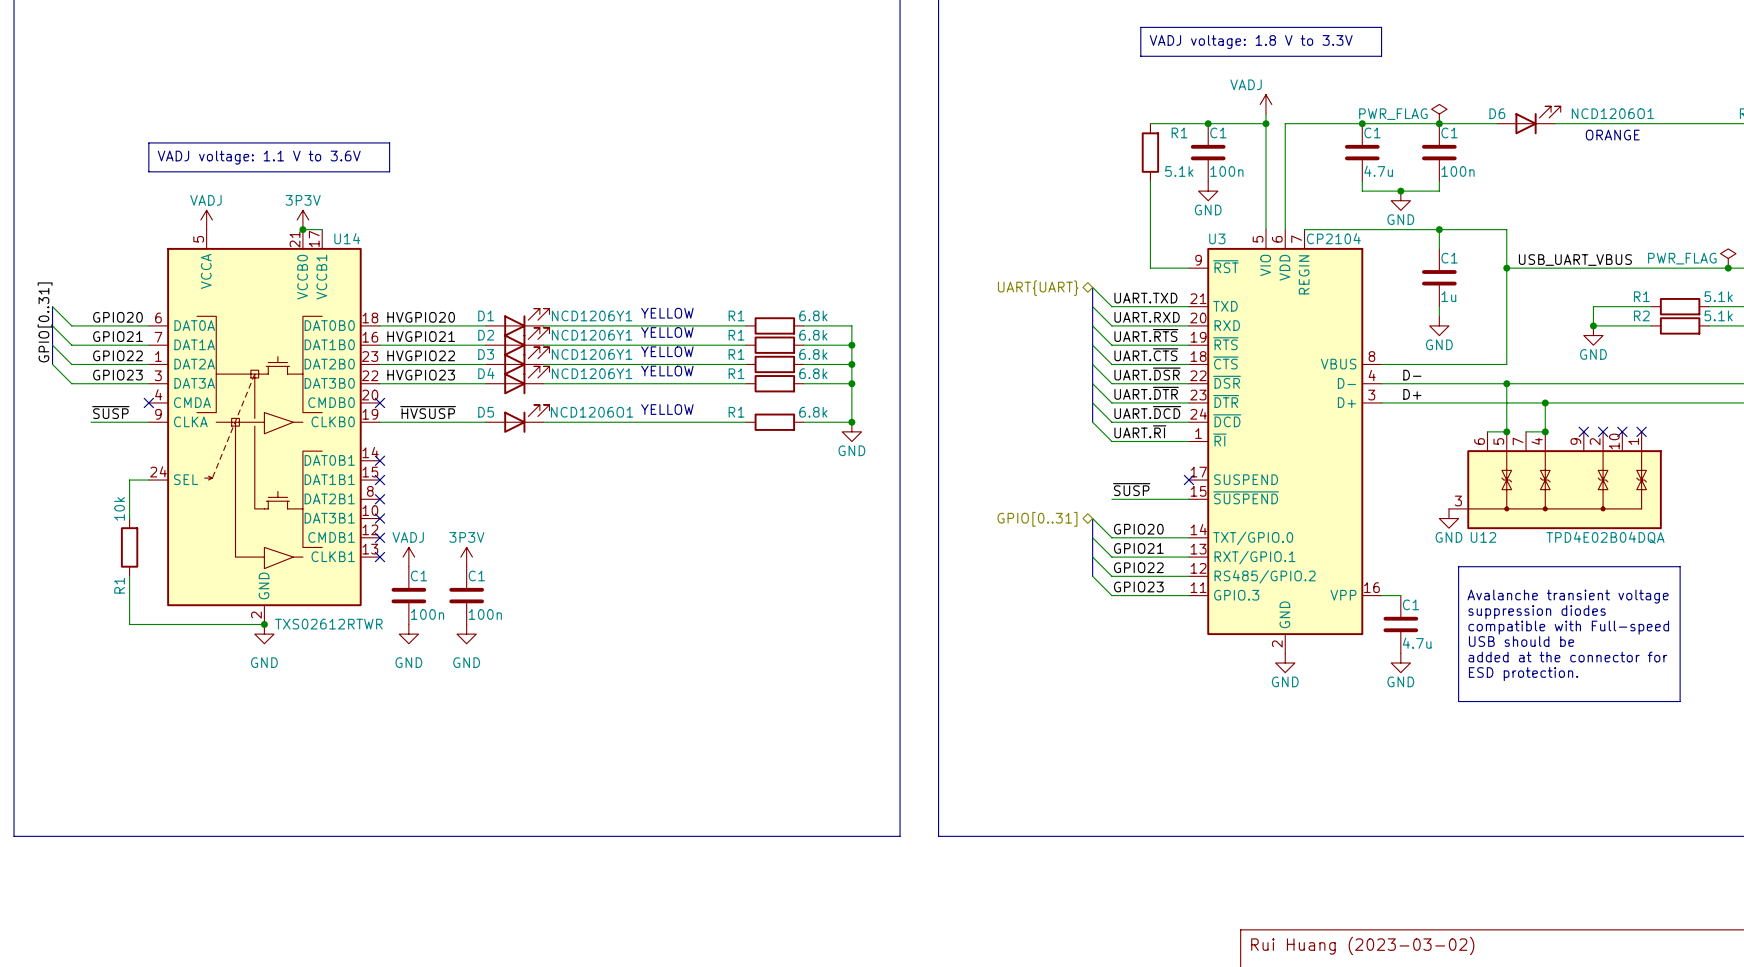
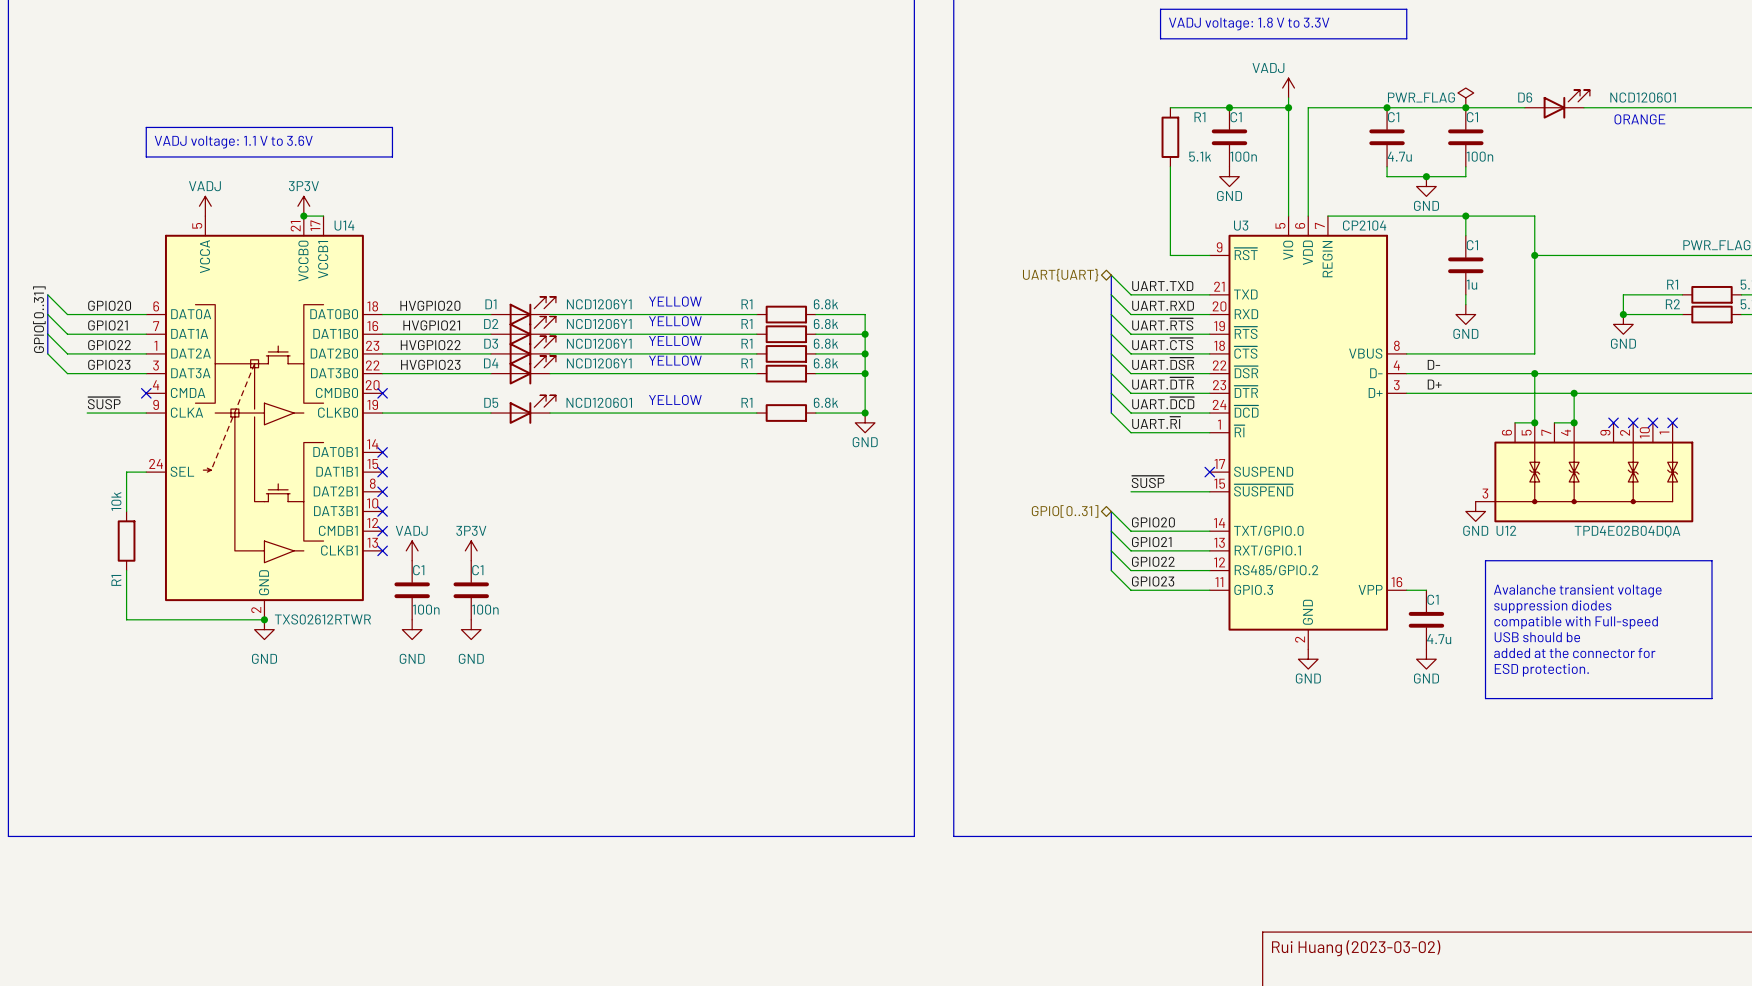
label: USB_UART_VBUS (1575, 260) -> none
label: ~{HVSUSP} (428, 412) -> none

